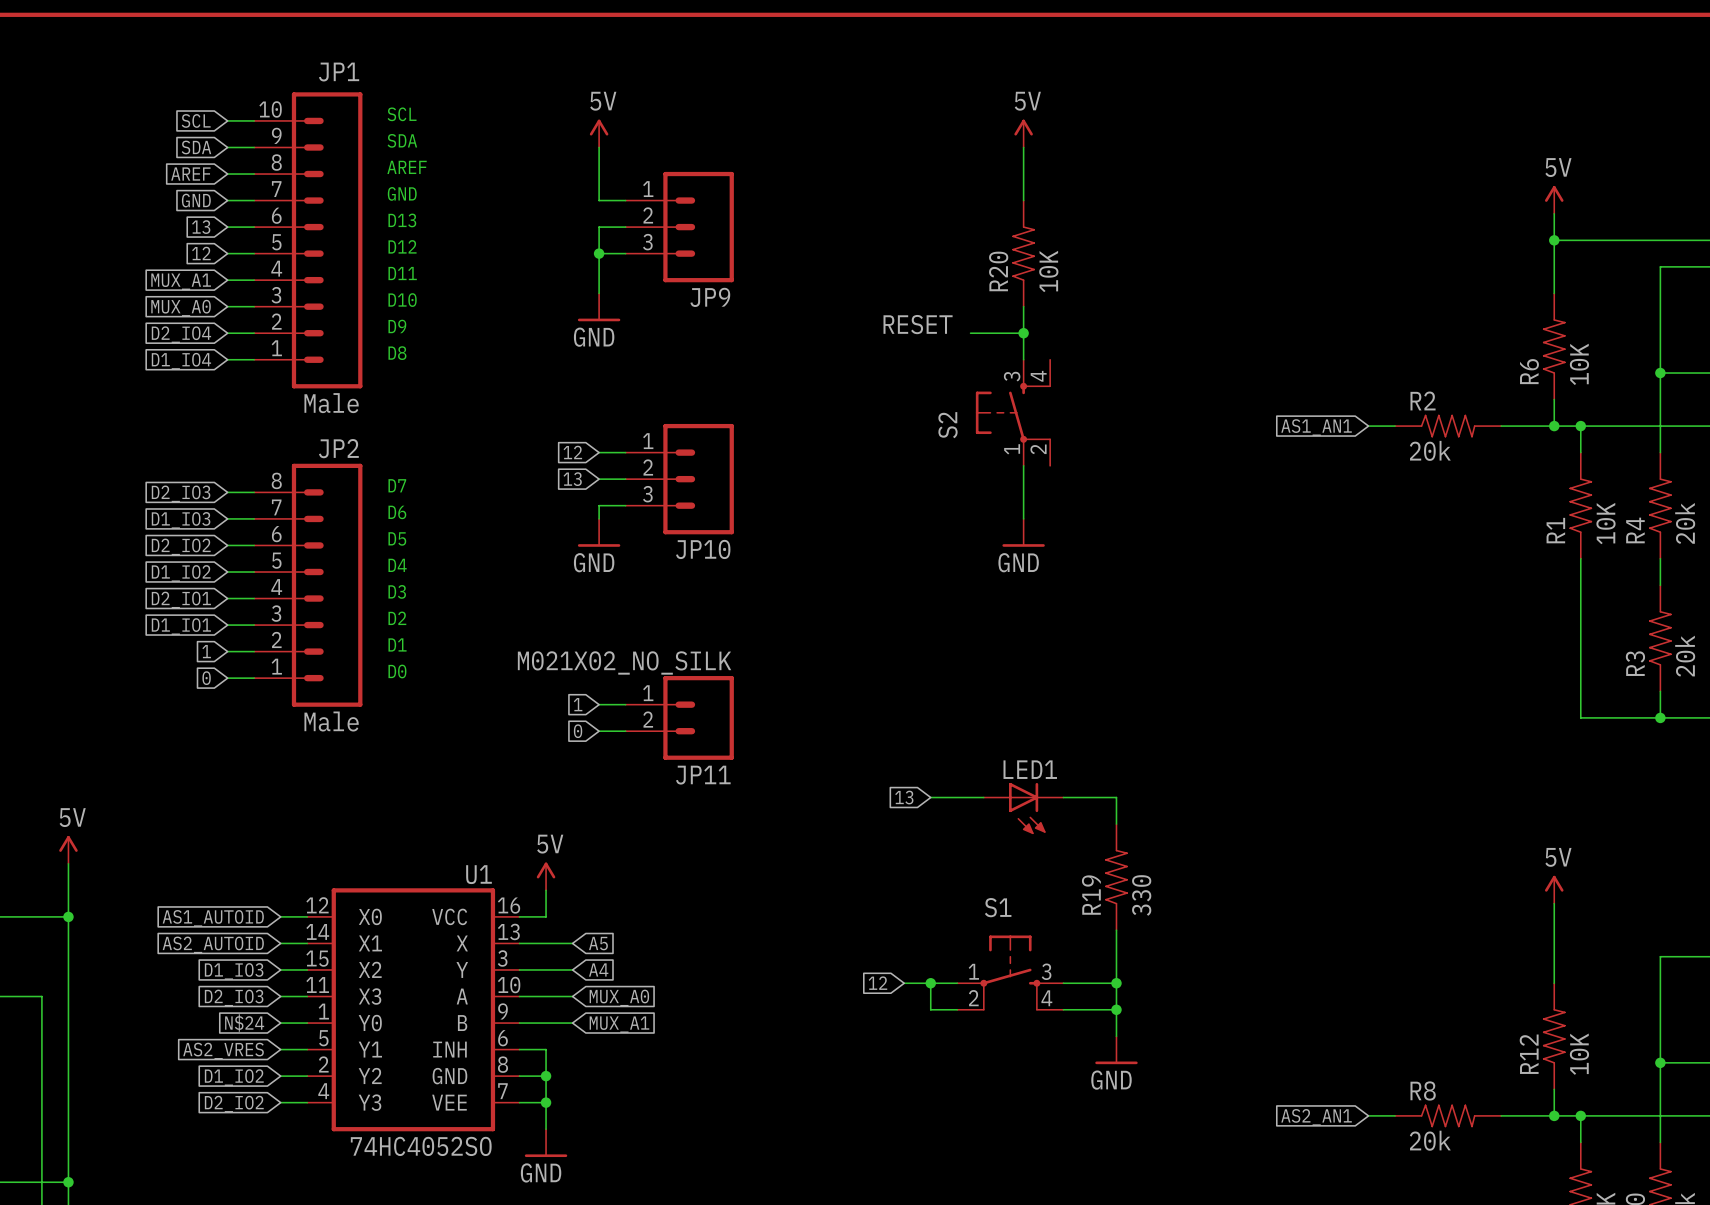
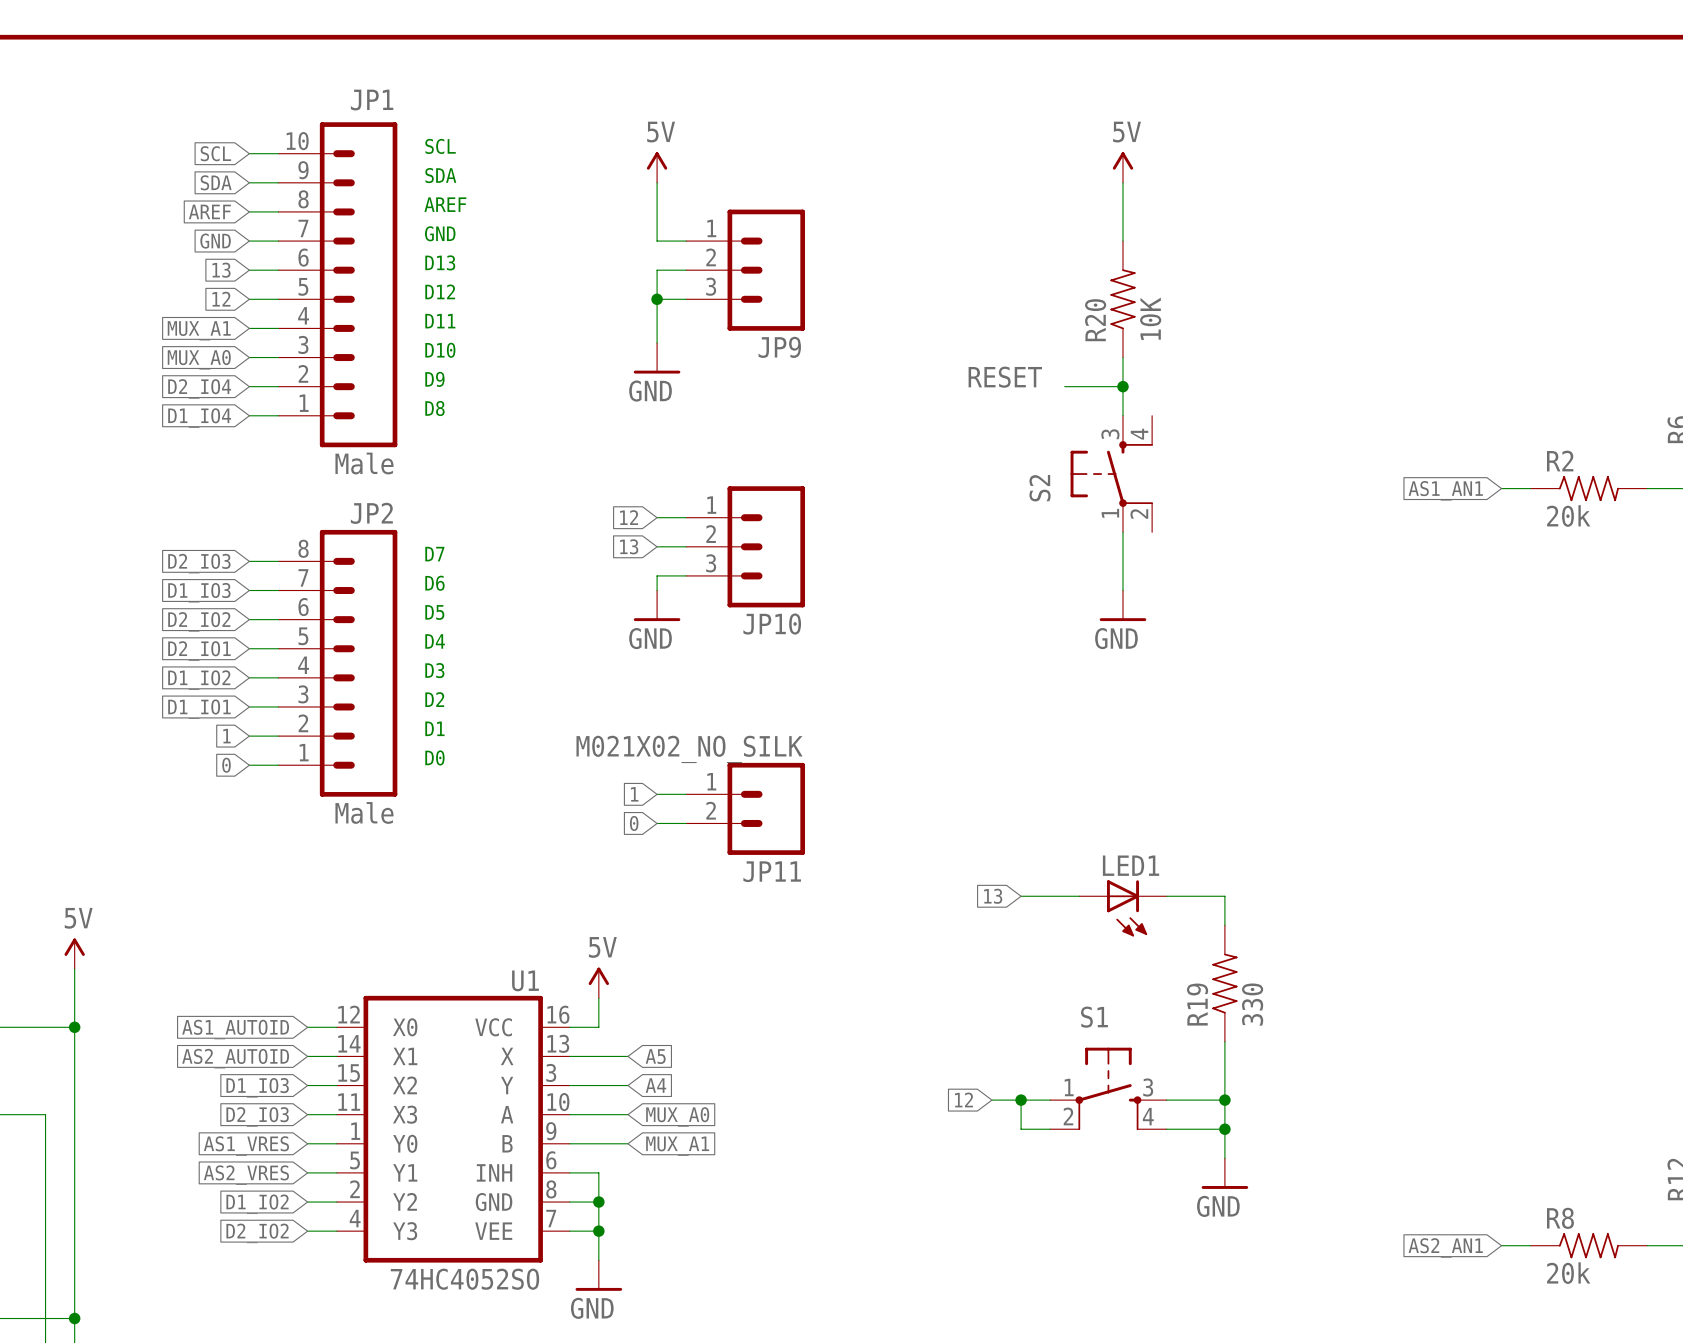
global label: D1_IO2 (181, 573) -> D2_IO1 (199, 650)
global label: D2_IO1 (181, 600) -> D1_IO2 (199, 680)
global label: N$24 (244, 1023) -> AS1_VRES (246, 1146)

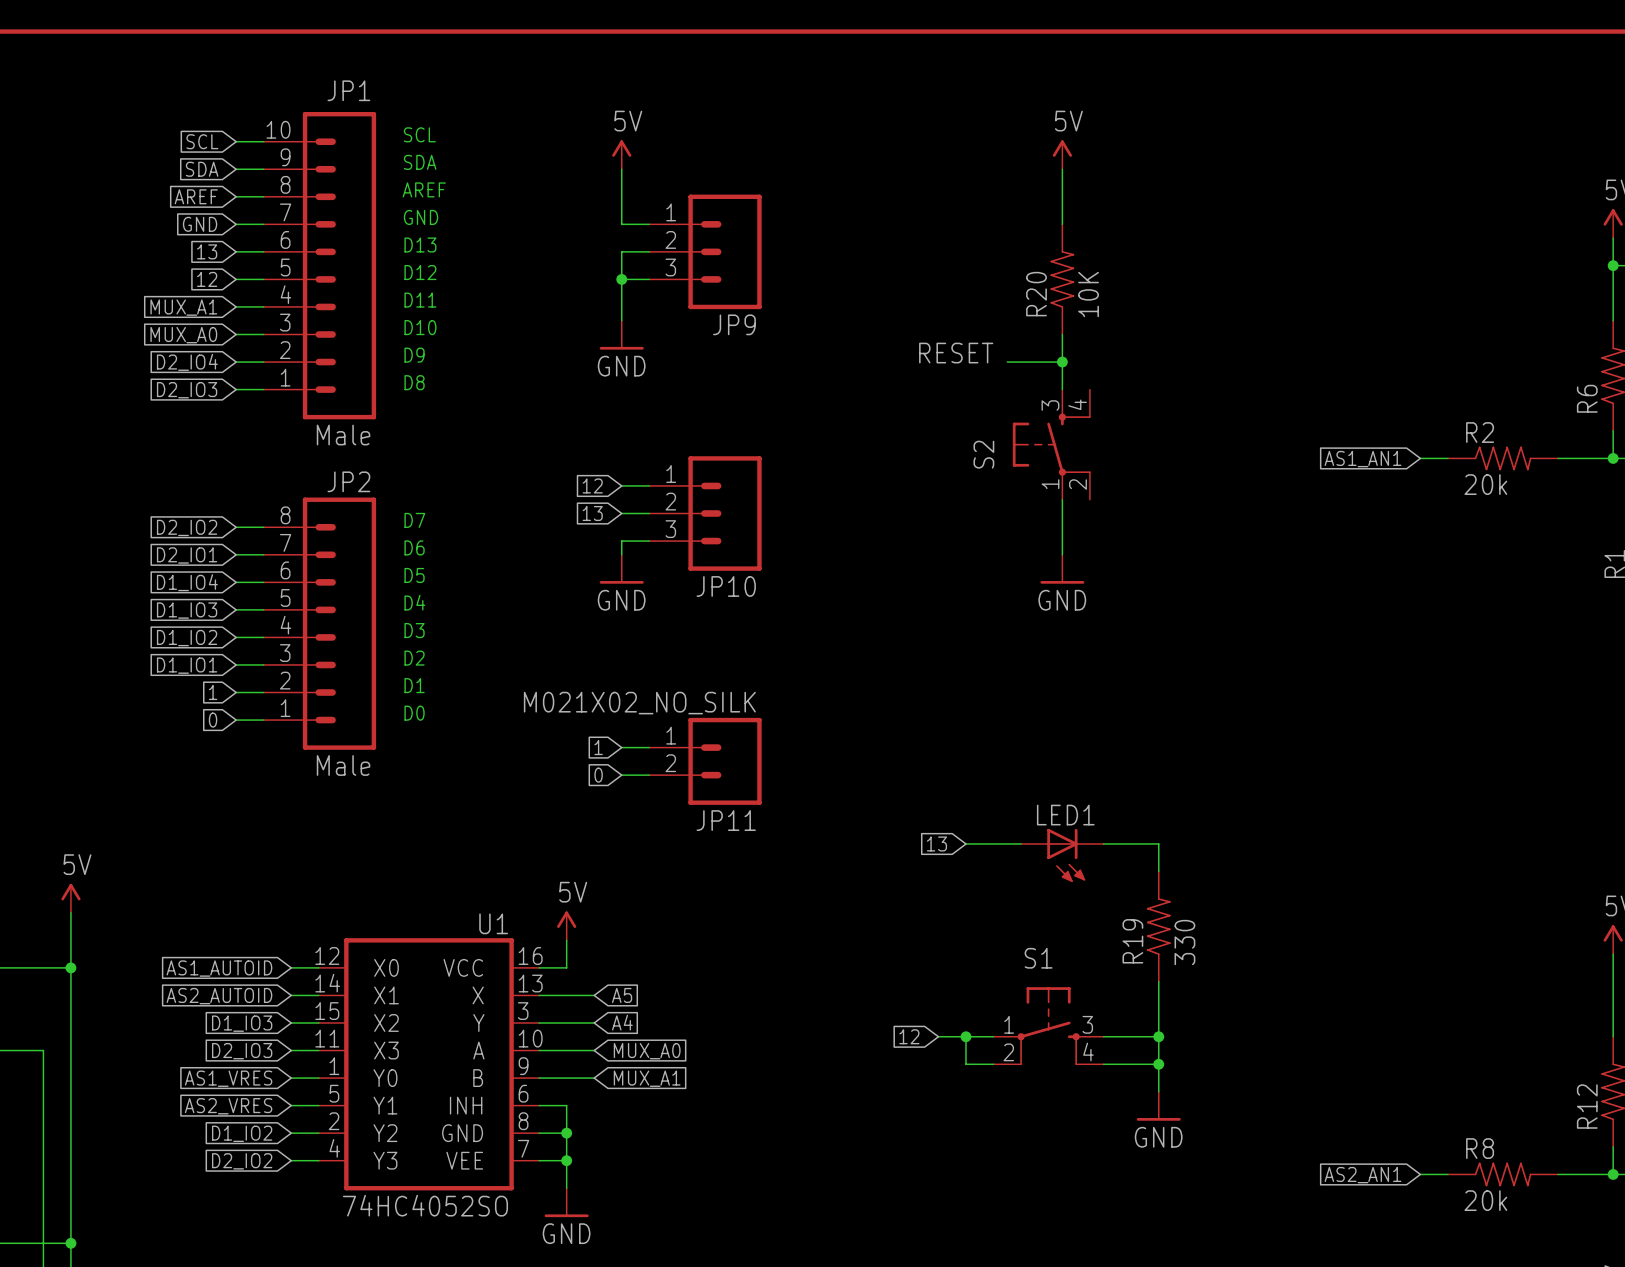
global label: D1_IO4 (199, 418) -> D2_IO3 (187, 390)
global label: D2_IO3 (199, 563) -> D2_IO2 (187, 527)
global label: D1_IO3 (199, 592) -> D2_IO1 (187, 555)
global label: D2_IO2 (199, 621) -> D1_IO4 (187, 582)
global label: D2_IO1 (199, 650) -> D1_IO3 (187, 610)

